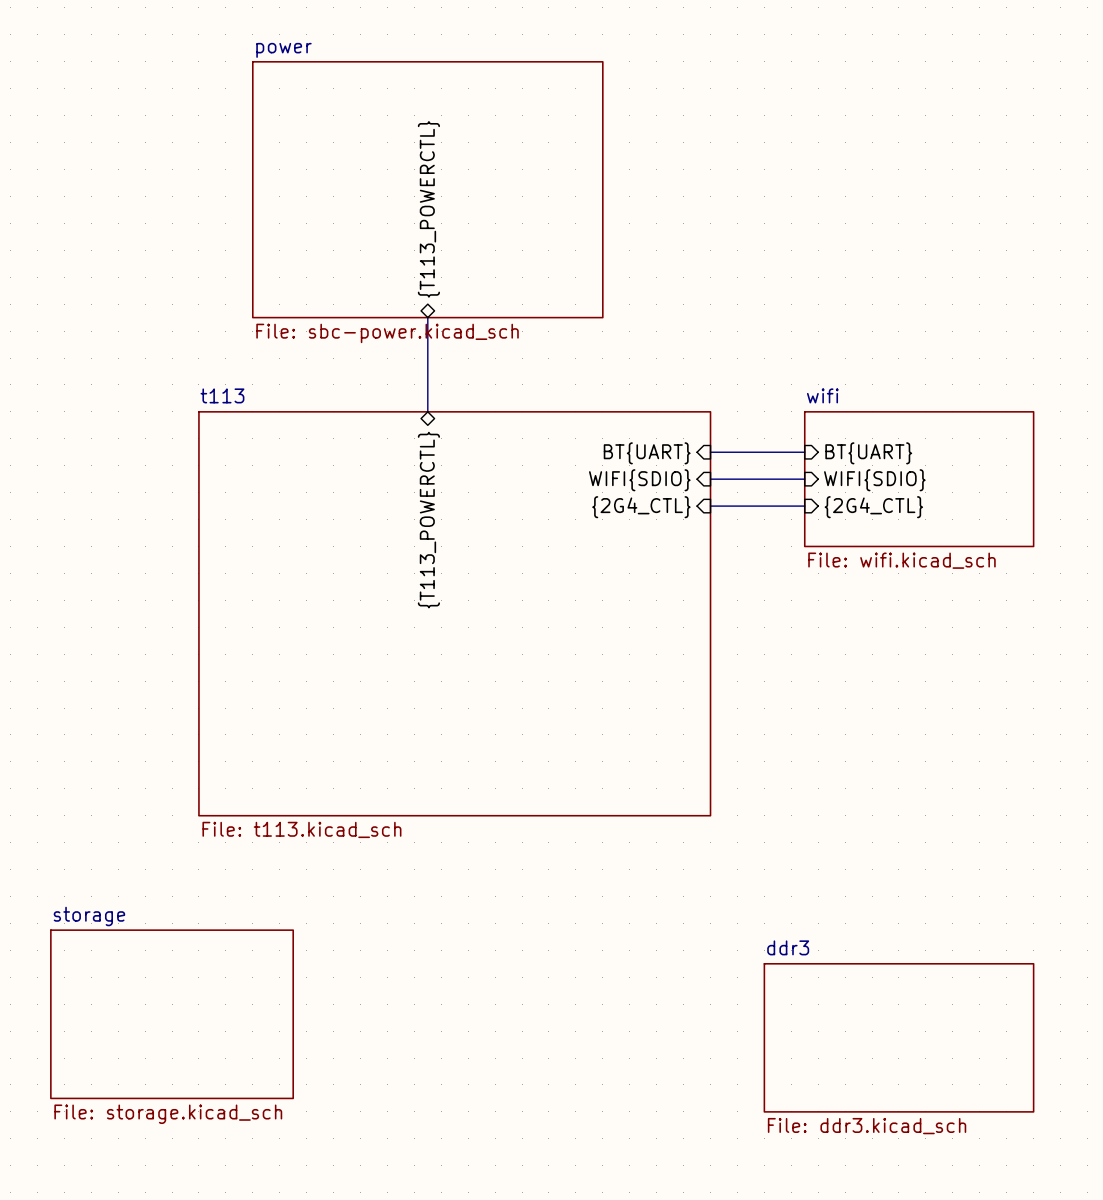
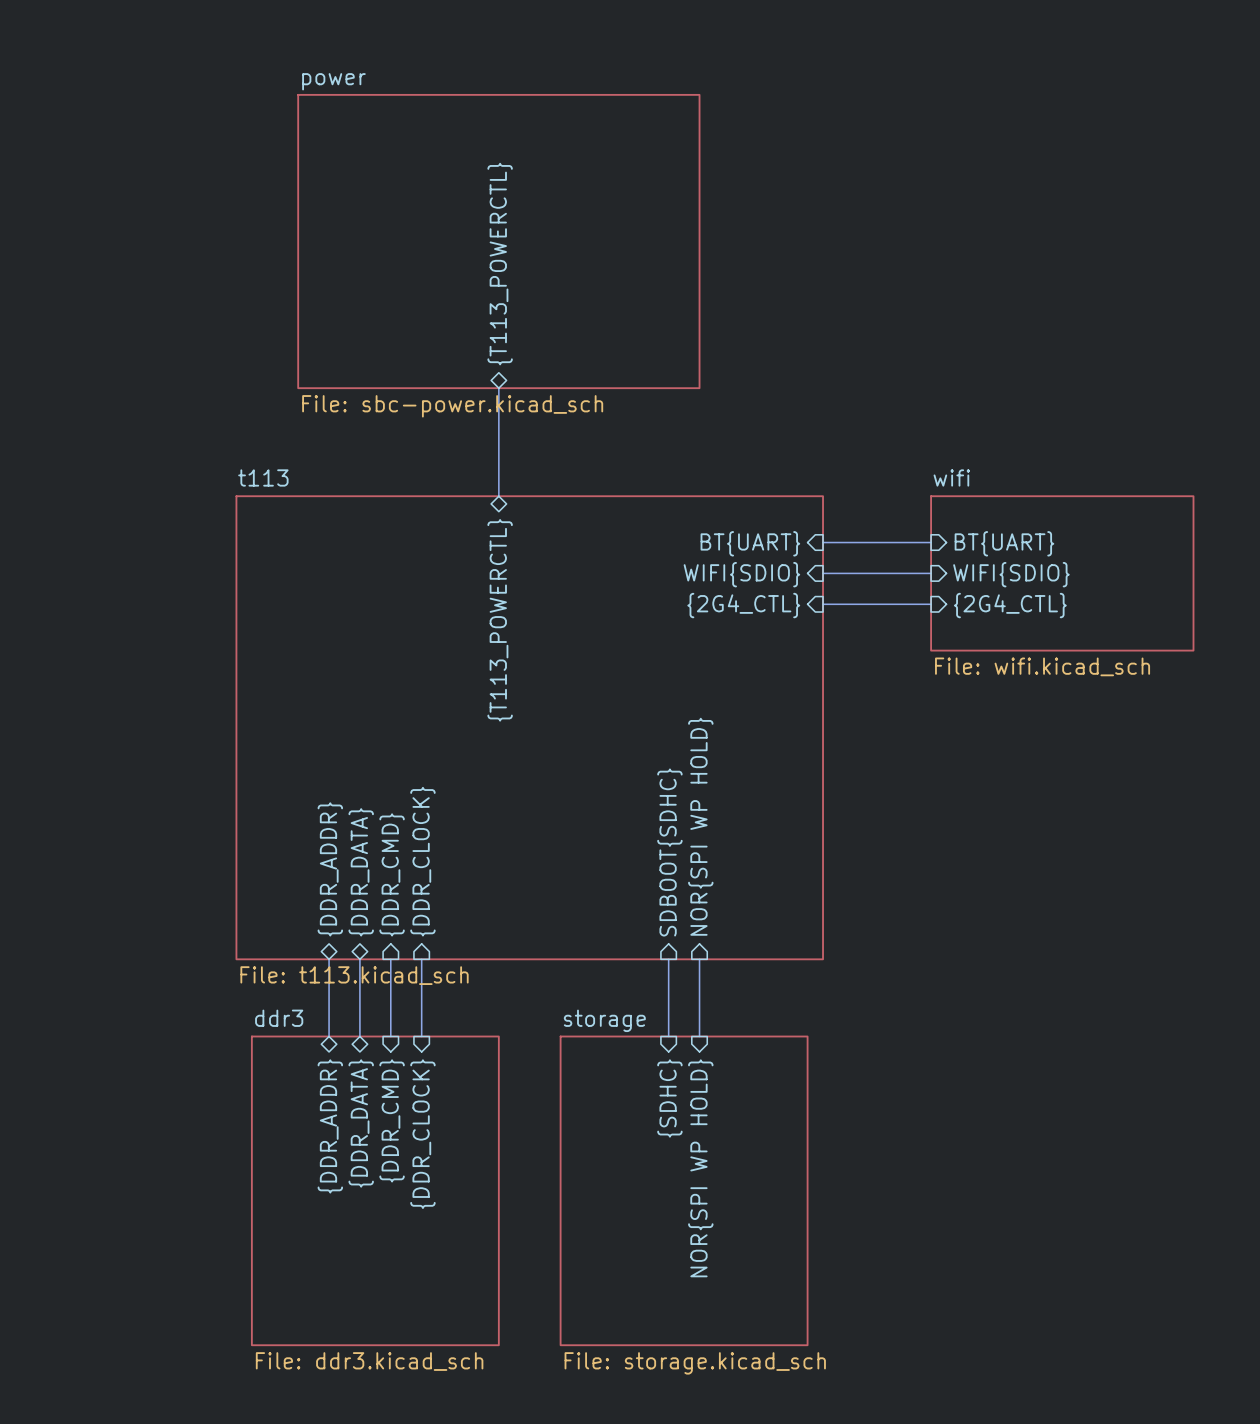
sheet pin: none -> NOR{SPI WP HOLD} (700, 826)
sheet pin: none -> SDBOOT{SDHC} (669, 852)
sheet pin: none -> {DDR_CLOCK} (422, 861)
sheet pin: none -> {DDR_ADDR} (330, 869)
sheet pin: none -> {DDR_DATA} (361, 872)
sheet pin: none -> {DDR_CMD} (392, 874)
bus: none -> (329, 959) (329, 1036)
bus: none -> (359, 959) (359, 1036)
bus: none -> (390, 959) (390, 1036)
bus: none -> (421, 959) (421, 1036)
bus: none -> (668, 959) (668, 1036)
bus: none -> (699, 959) (699, 1036)
sheet pin: none -> {SDHC} (669, 1098)
sheet ddr3 name position: ddr3 (788, 947) -> ddr3 (279, 1018)
sheet pin: none -> {DDR_CMD} (392, 1120)
sheet pin: none -> {DDR_DATA} (361, 1123)
sheet pin: none -> {DDR_ADDR} (330, 1126)
sheet ddr3 shape: [763, 962, 1035, 1113] -> [250, 1035, 500, 1347]
sheet pin: none -> {DDR_CLOCK} (422, 1134)
sheet pin: none -> NOR{SPI WP HOLD} (700, 1168)
sheet storage: File: storage.kicad_sch (172, 1014) -> none
sheet storage: none -> File: storage.kicad_sch (684, 1190)
sheet ddr3 value position: File: ddr3.kicad_sch (867, 1126) -> File: ddr3.kicad_sch (369, 1361)

